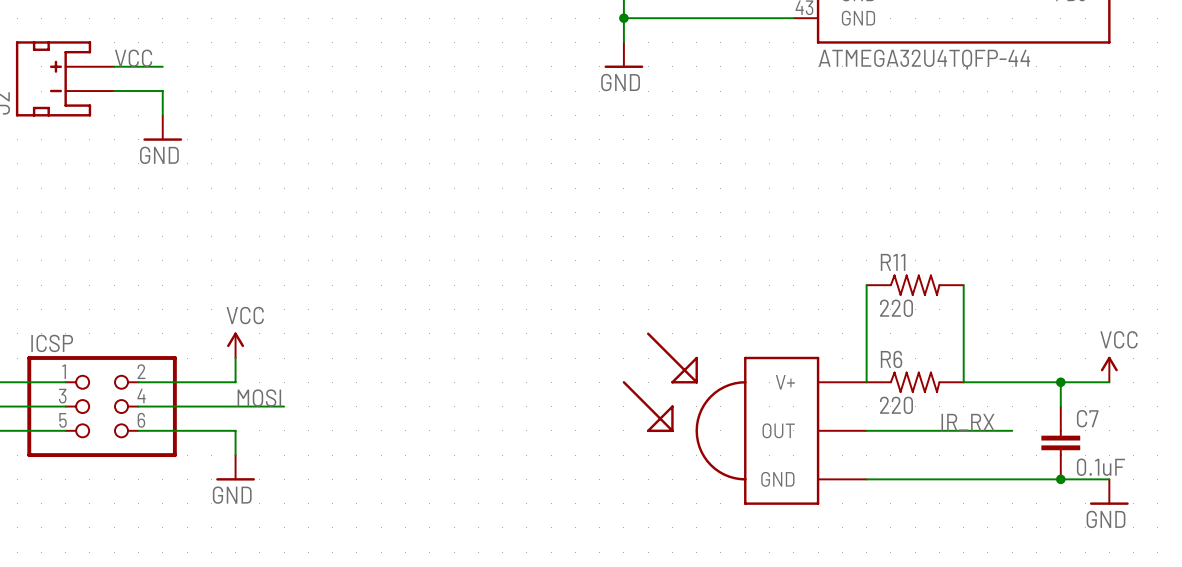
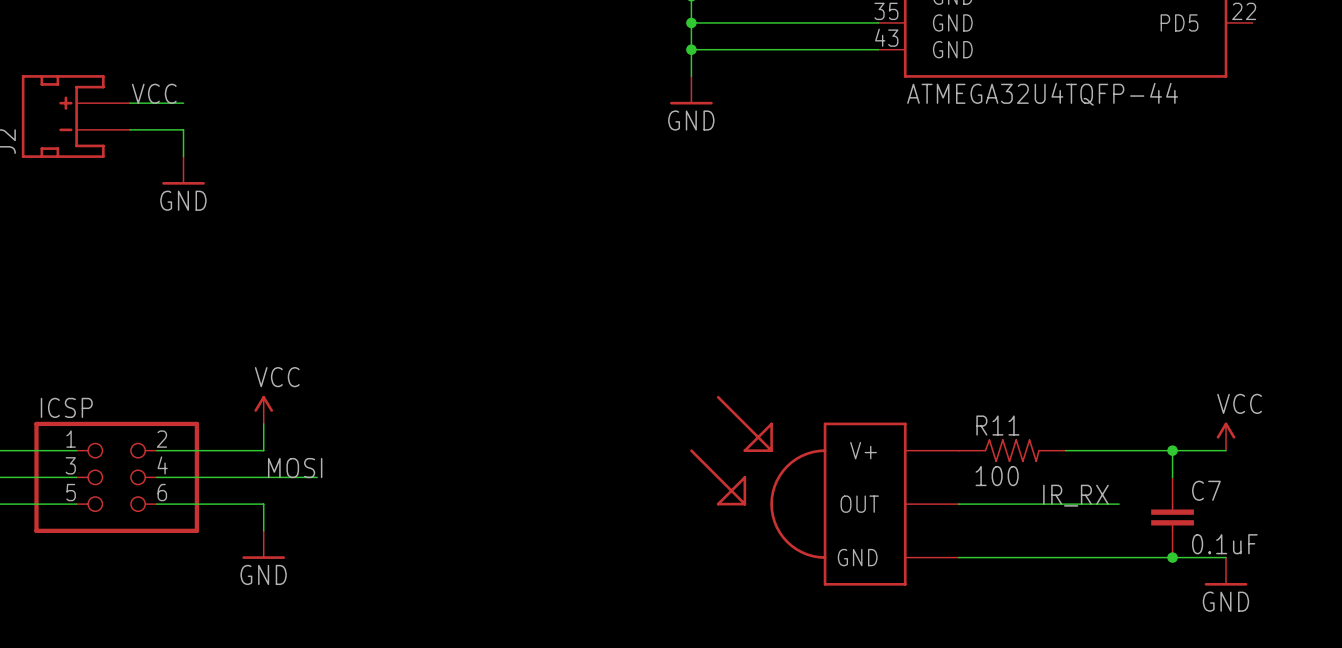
wire: (866, 285) (866, 382) -> none
R11: 220 (915, 285) -> none
wire: (963, 285) (963, 382) -> none
R6 name: R6 (891, 359) -> R11 (997, 425)
R6 value: 220 (896, 405) -> 100 (997, 476)

